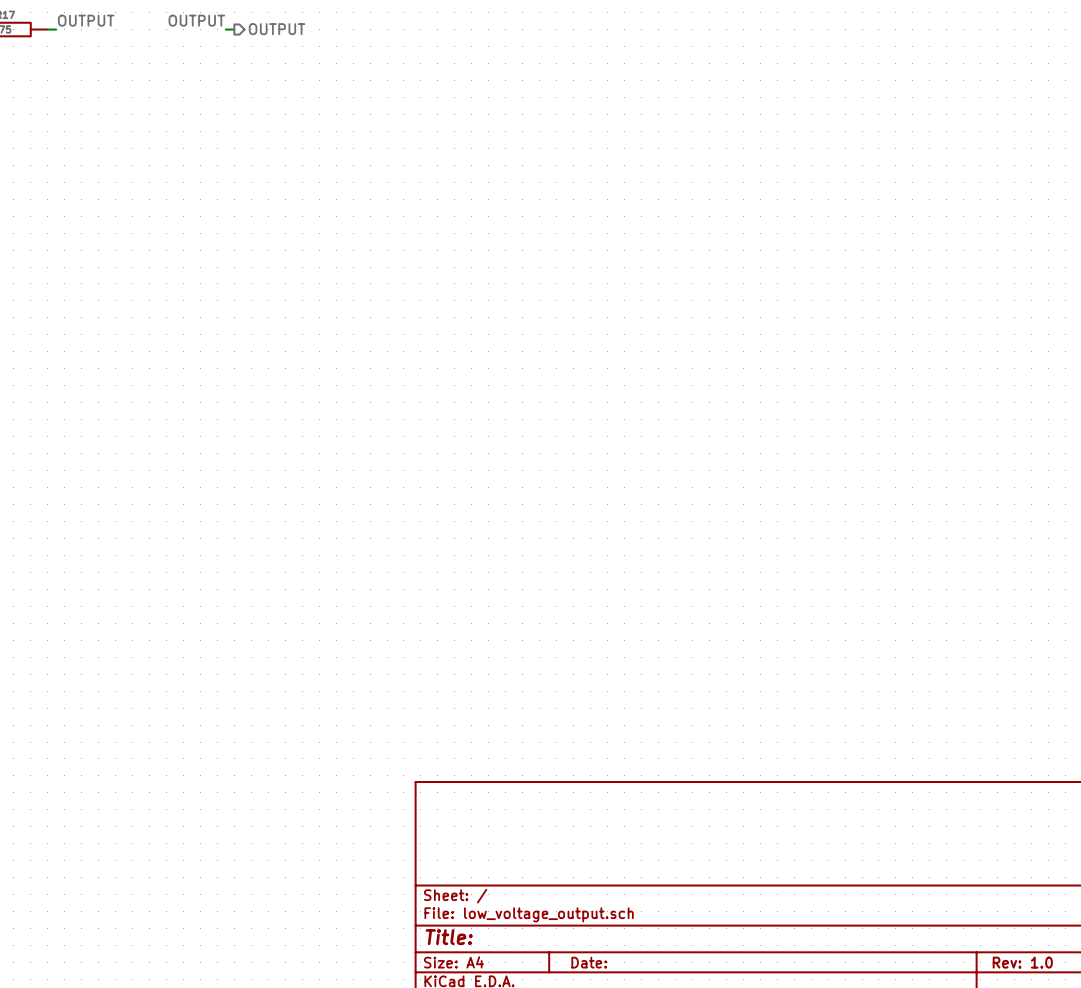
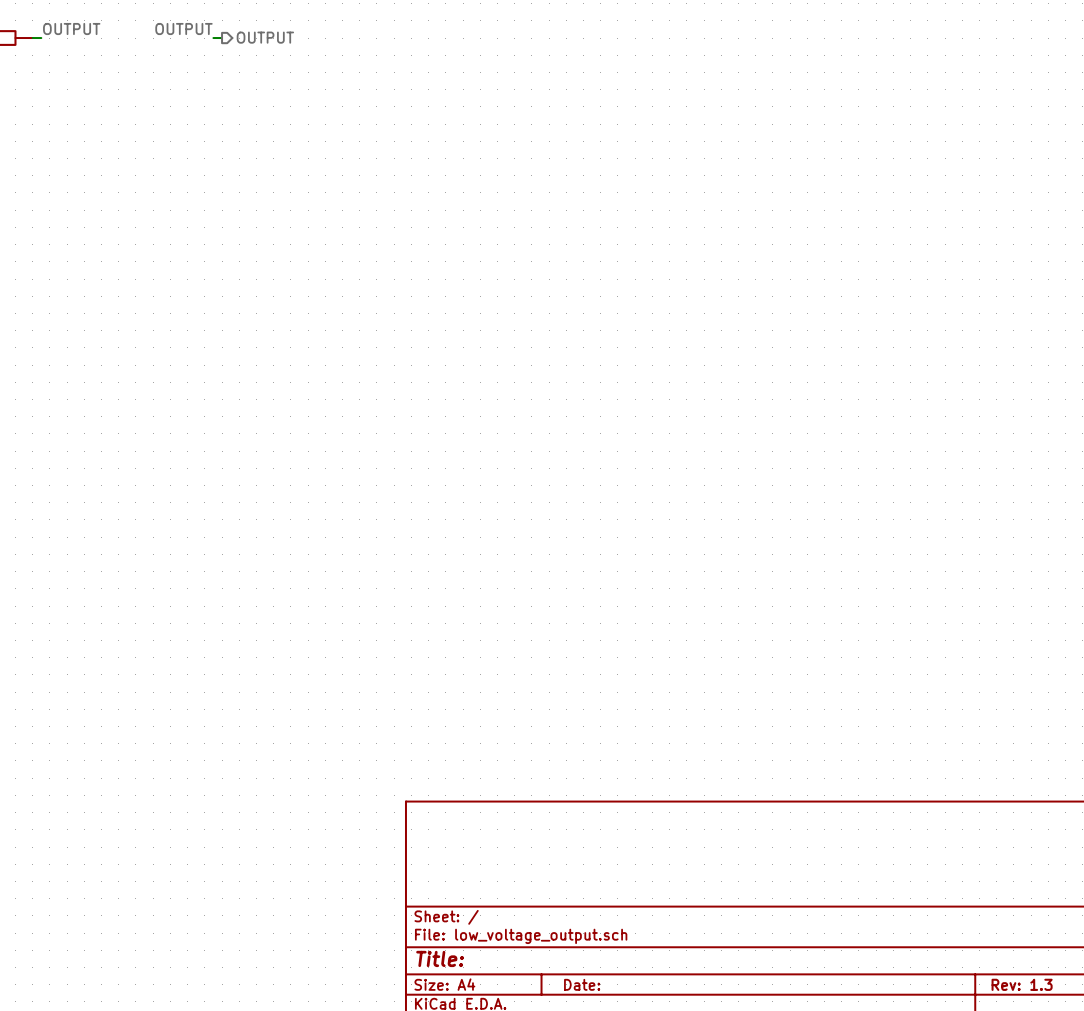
title block: Rev: 1.0 (1022, 962) -> Rev: 1.3 (1022, 984)

